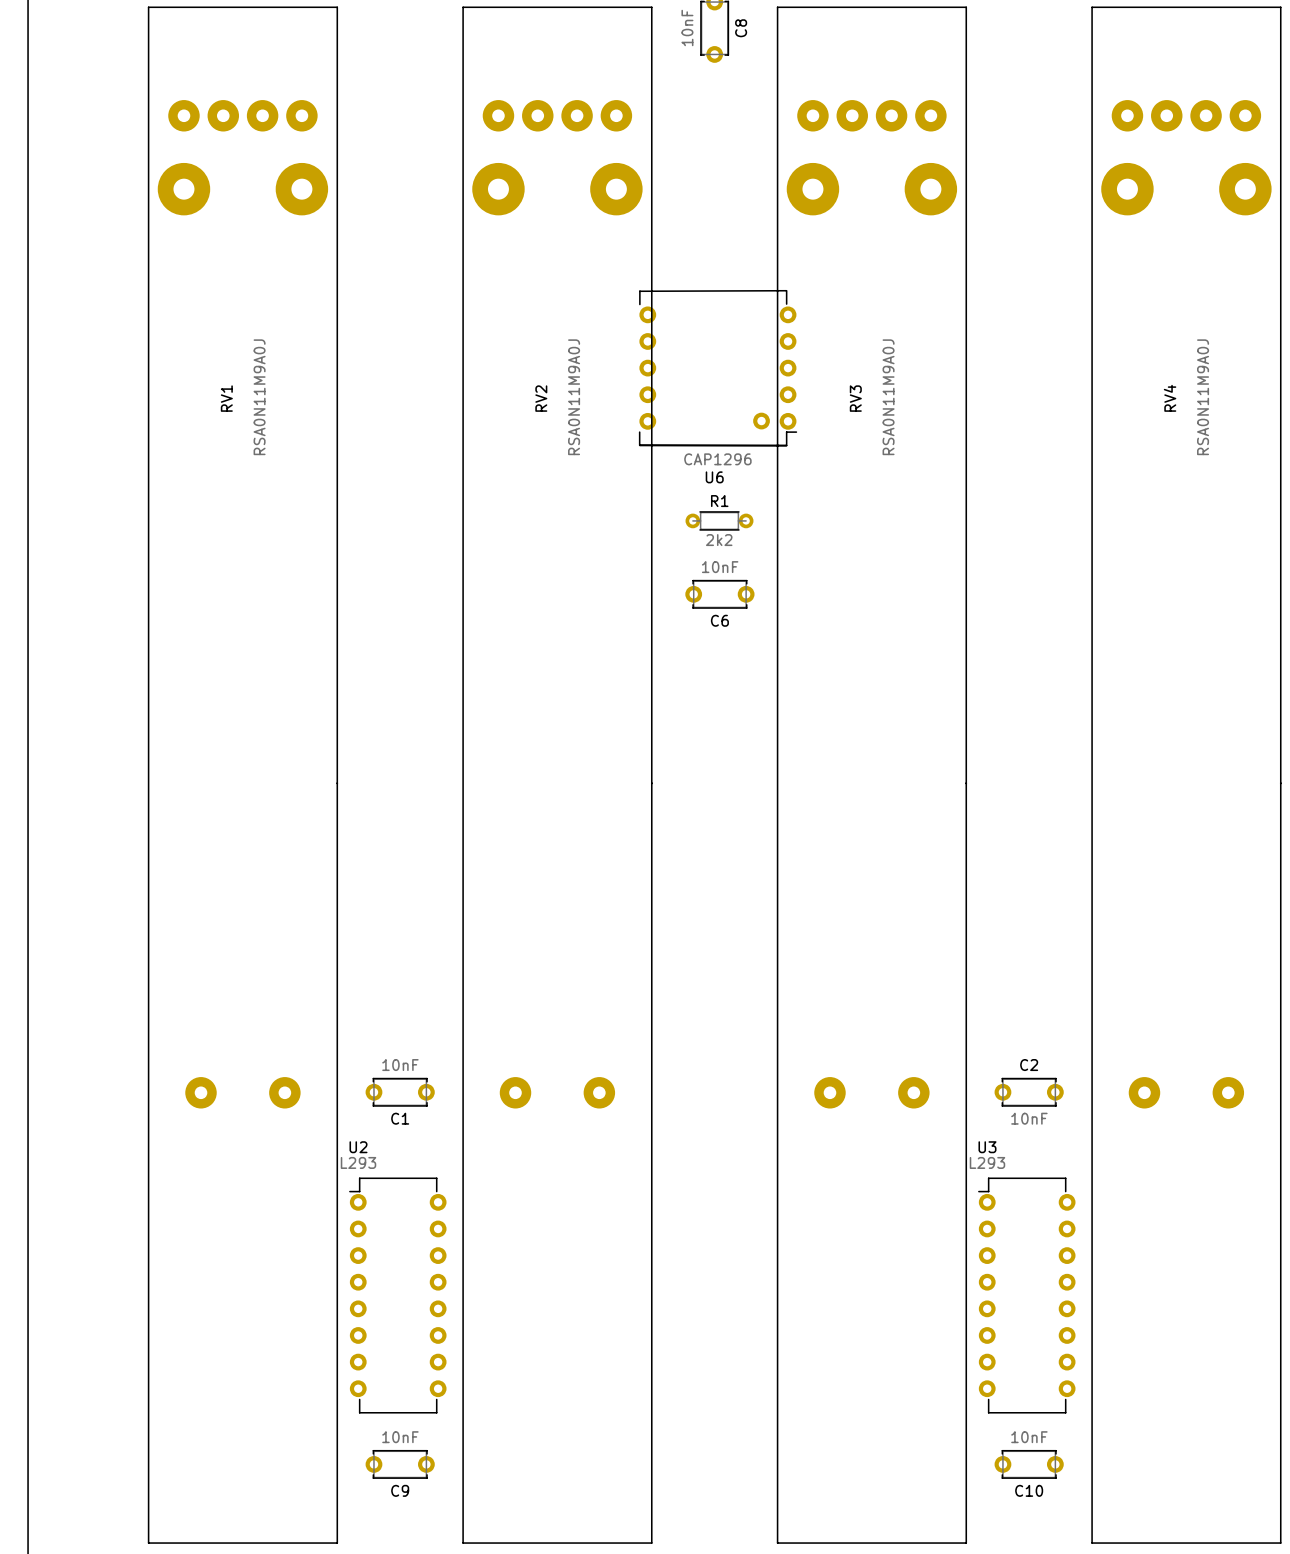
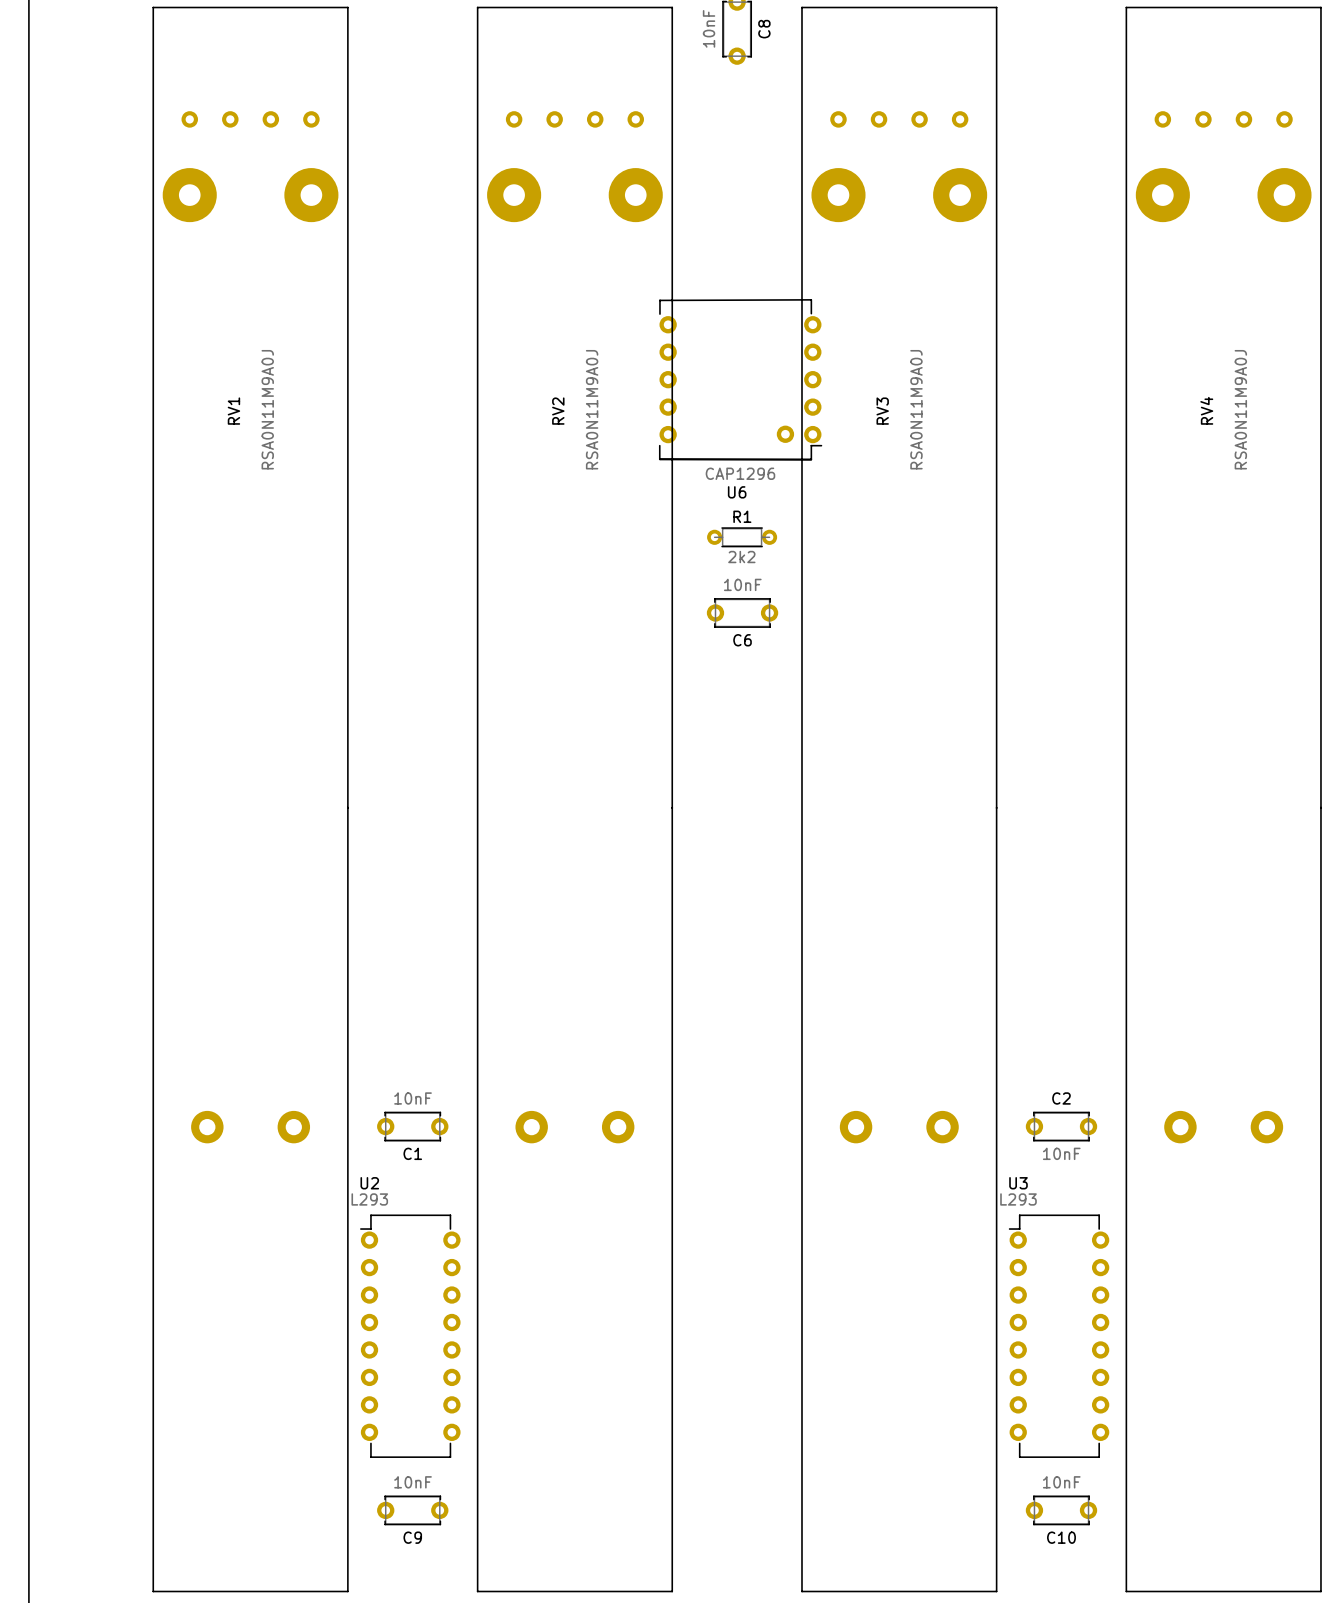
RV1 footprint: [147, 6, 339, 1544] -> [152, 6, 349, 1593]
RV2 footprint: [462, 6, 653, 1544] -> [476, 6, 674, 1593]
RV3 footprint: [776, 6, 968, 1544] -> [801, 6, 998, 1593]
RV4 footprint: [1091, 6, 1282, 1544] -> [1125, 6, 1322, 1593]

